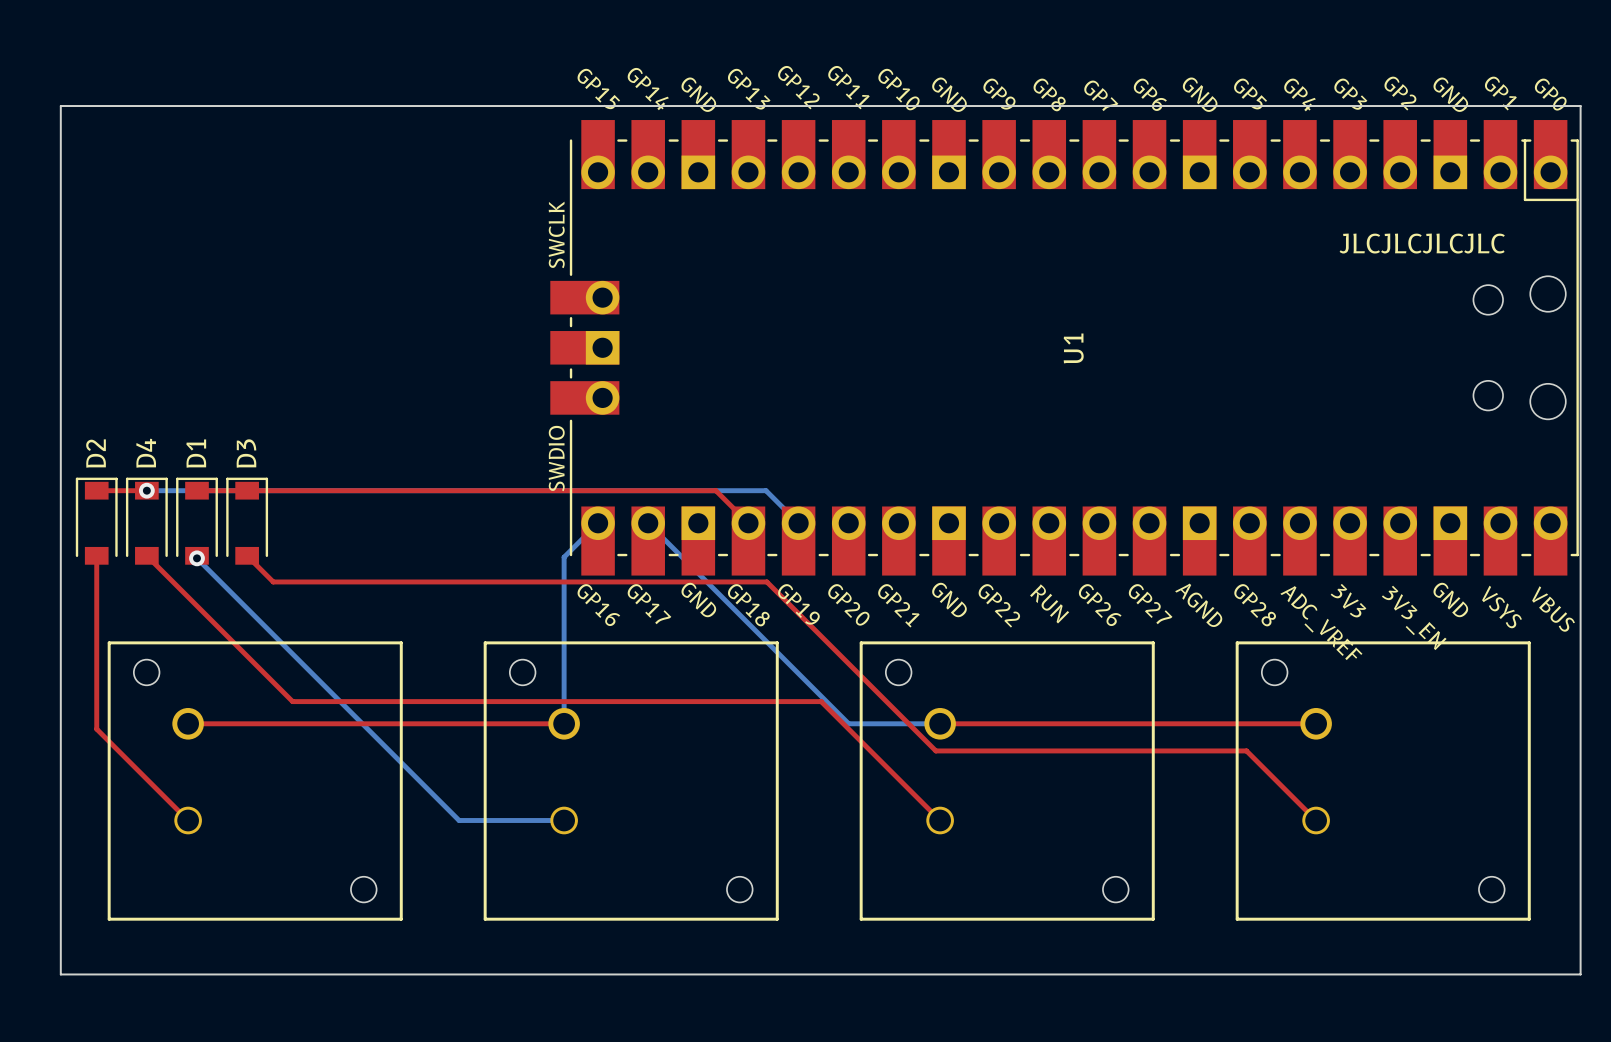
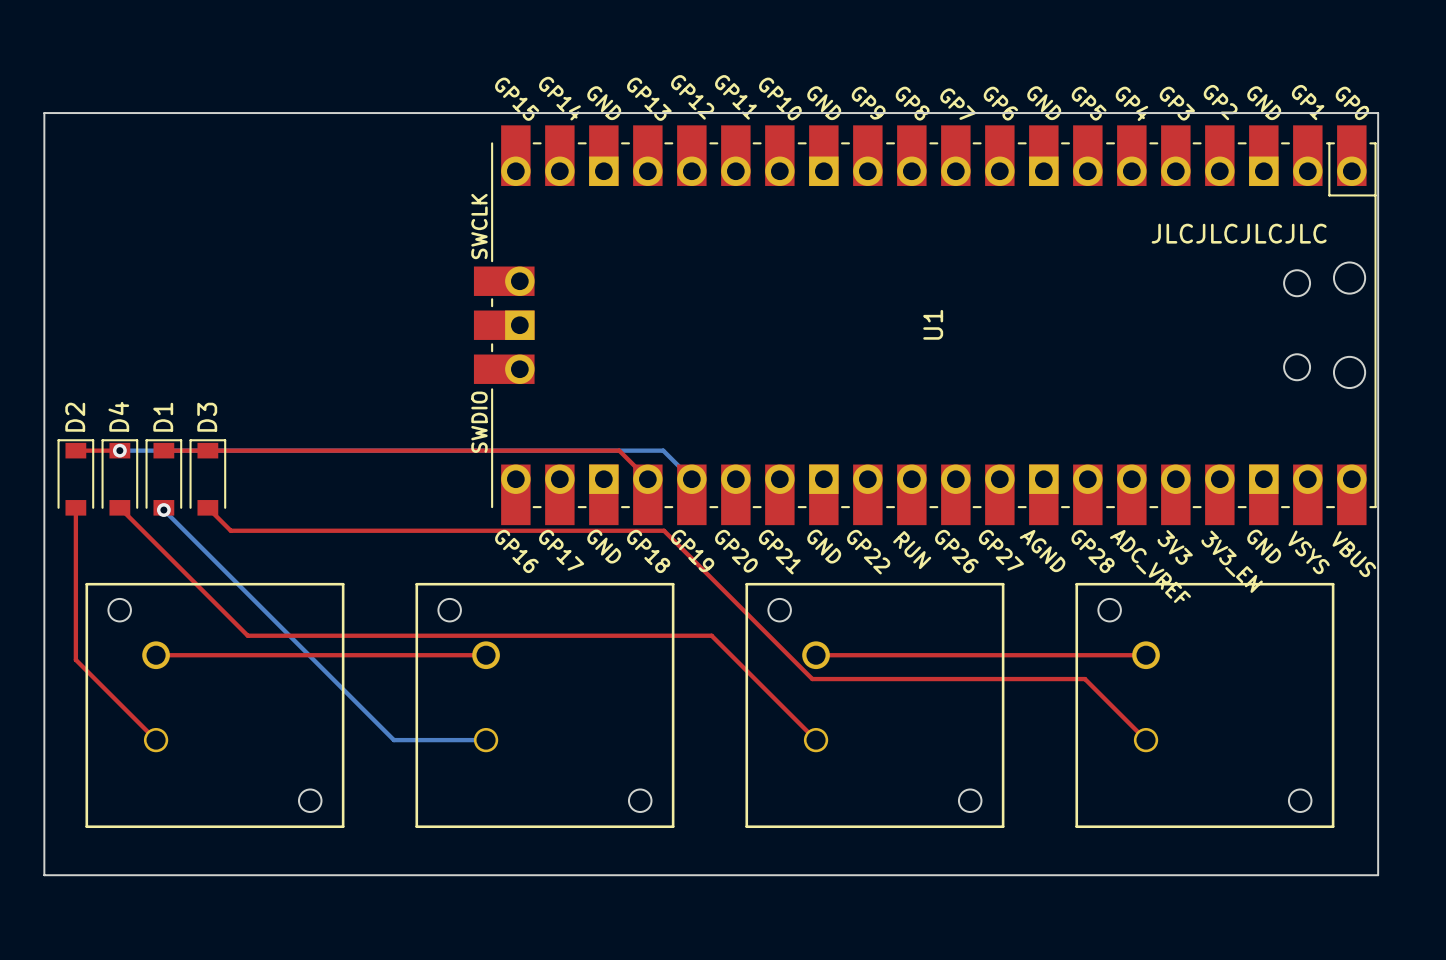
bottom track: (598, 523) (564, 557) (564, 723) -> none
bottom track: (648, 523) (848, 723) (940, 723) -> none

